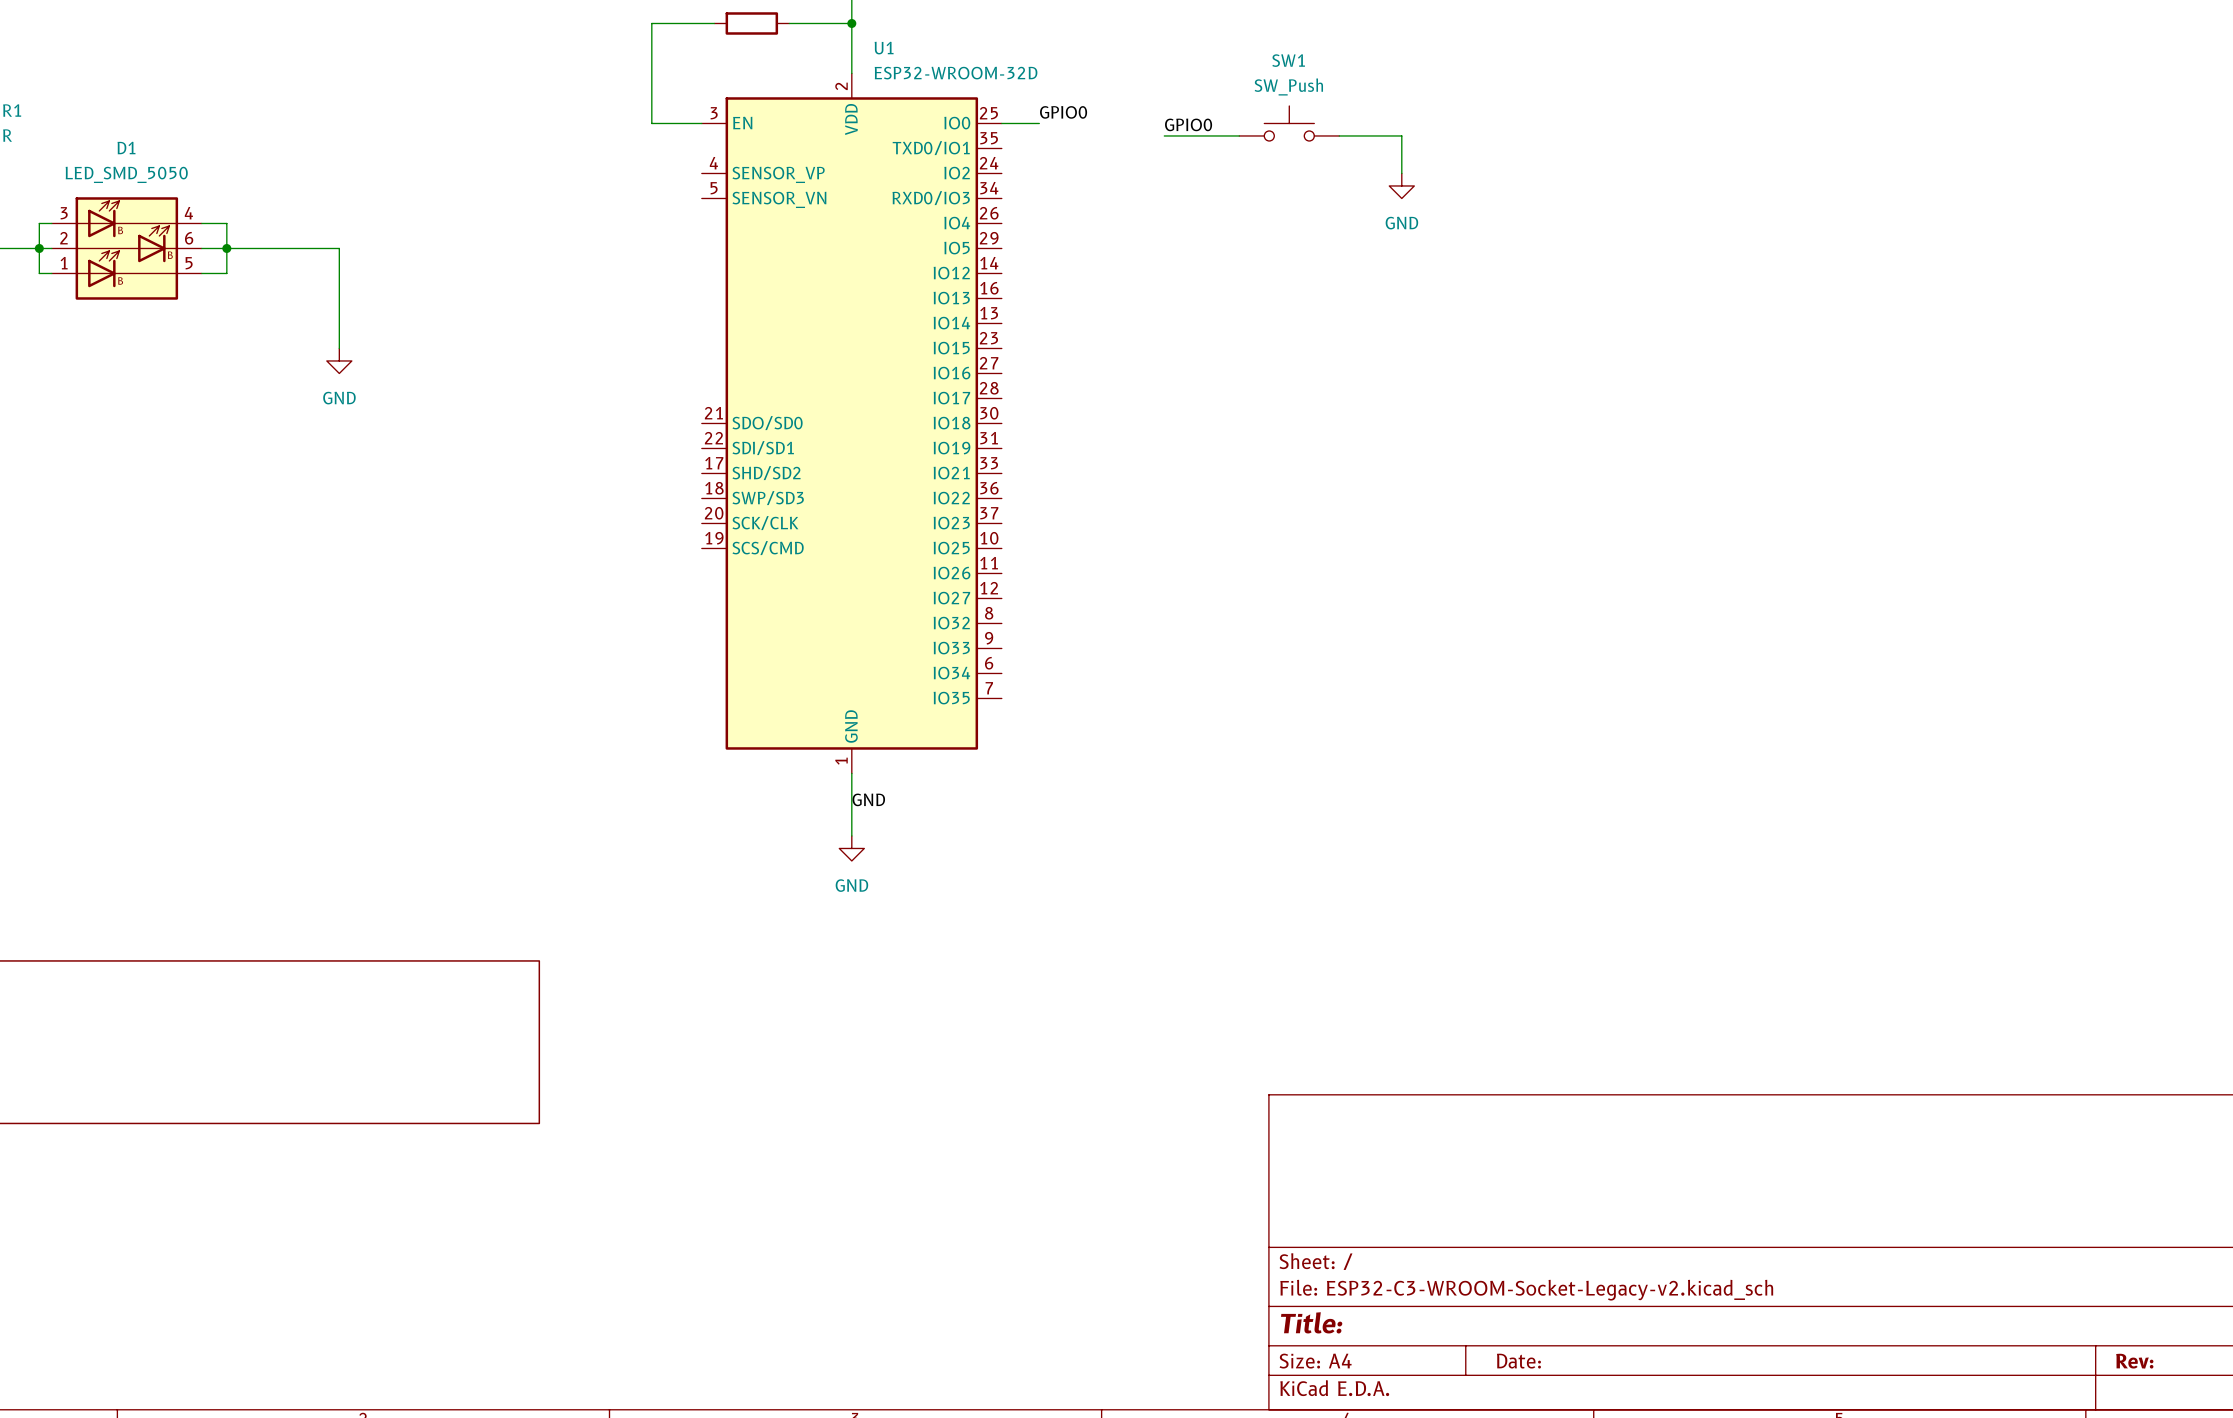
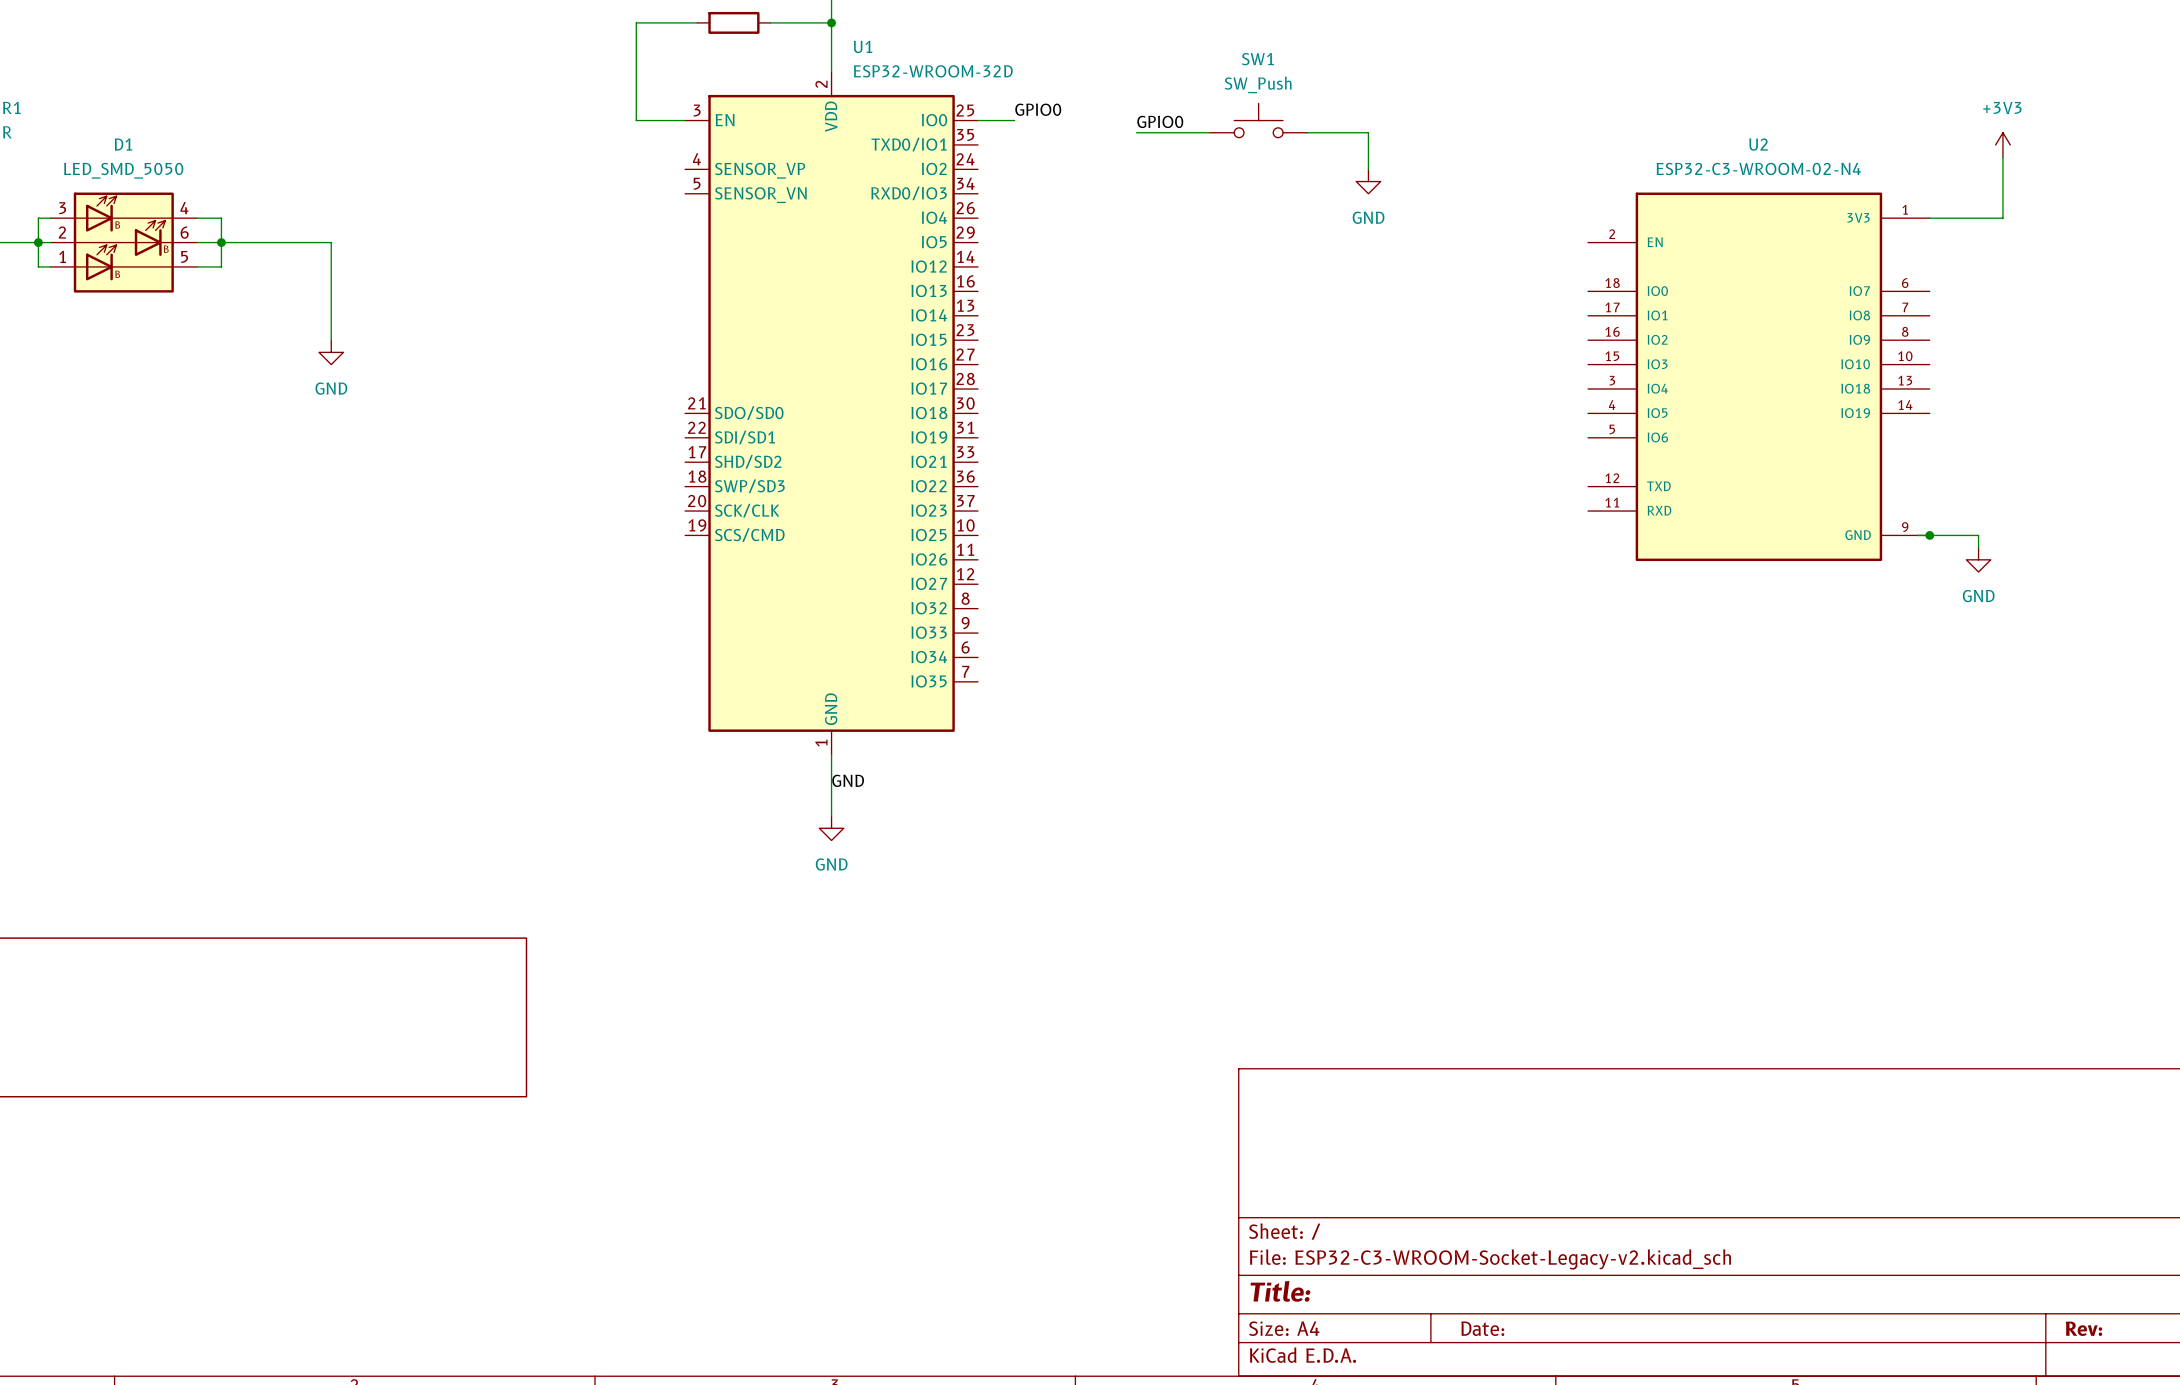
power symbol: none -> +3V3 (2002, 144)
wire: none -> (2002, 157) (2002, 218) (1929, 218)
U2: none -> ESP32-C3-WROOM-02-N4 (1758, 376)
wire: none -> (1917, 535) (1978, 535) (1978, 547)
junction: none -> (1929, 535)
power symbol: none -> GND (1978, 559)

